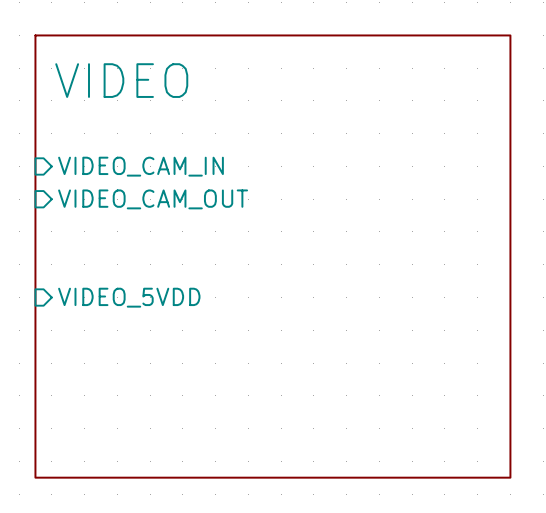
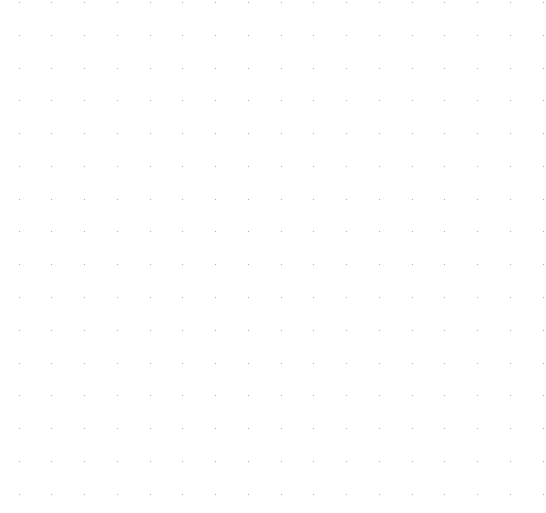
sheet pin: VIDEO_CAM_IN (140, 166) -> none
sheet pin: VIDEO_CAM_OUT (153, 199) -> none
sheet VIDEO: (272, 256) -> none
sheet pin: VIDEO_5VDD (129, 297) -> none

